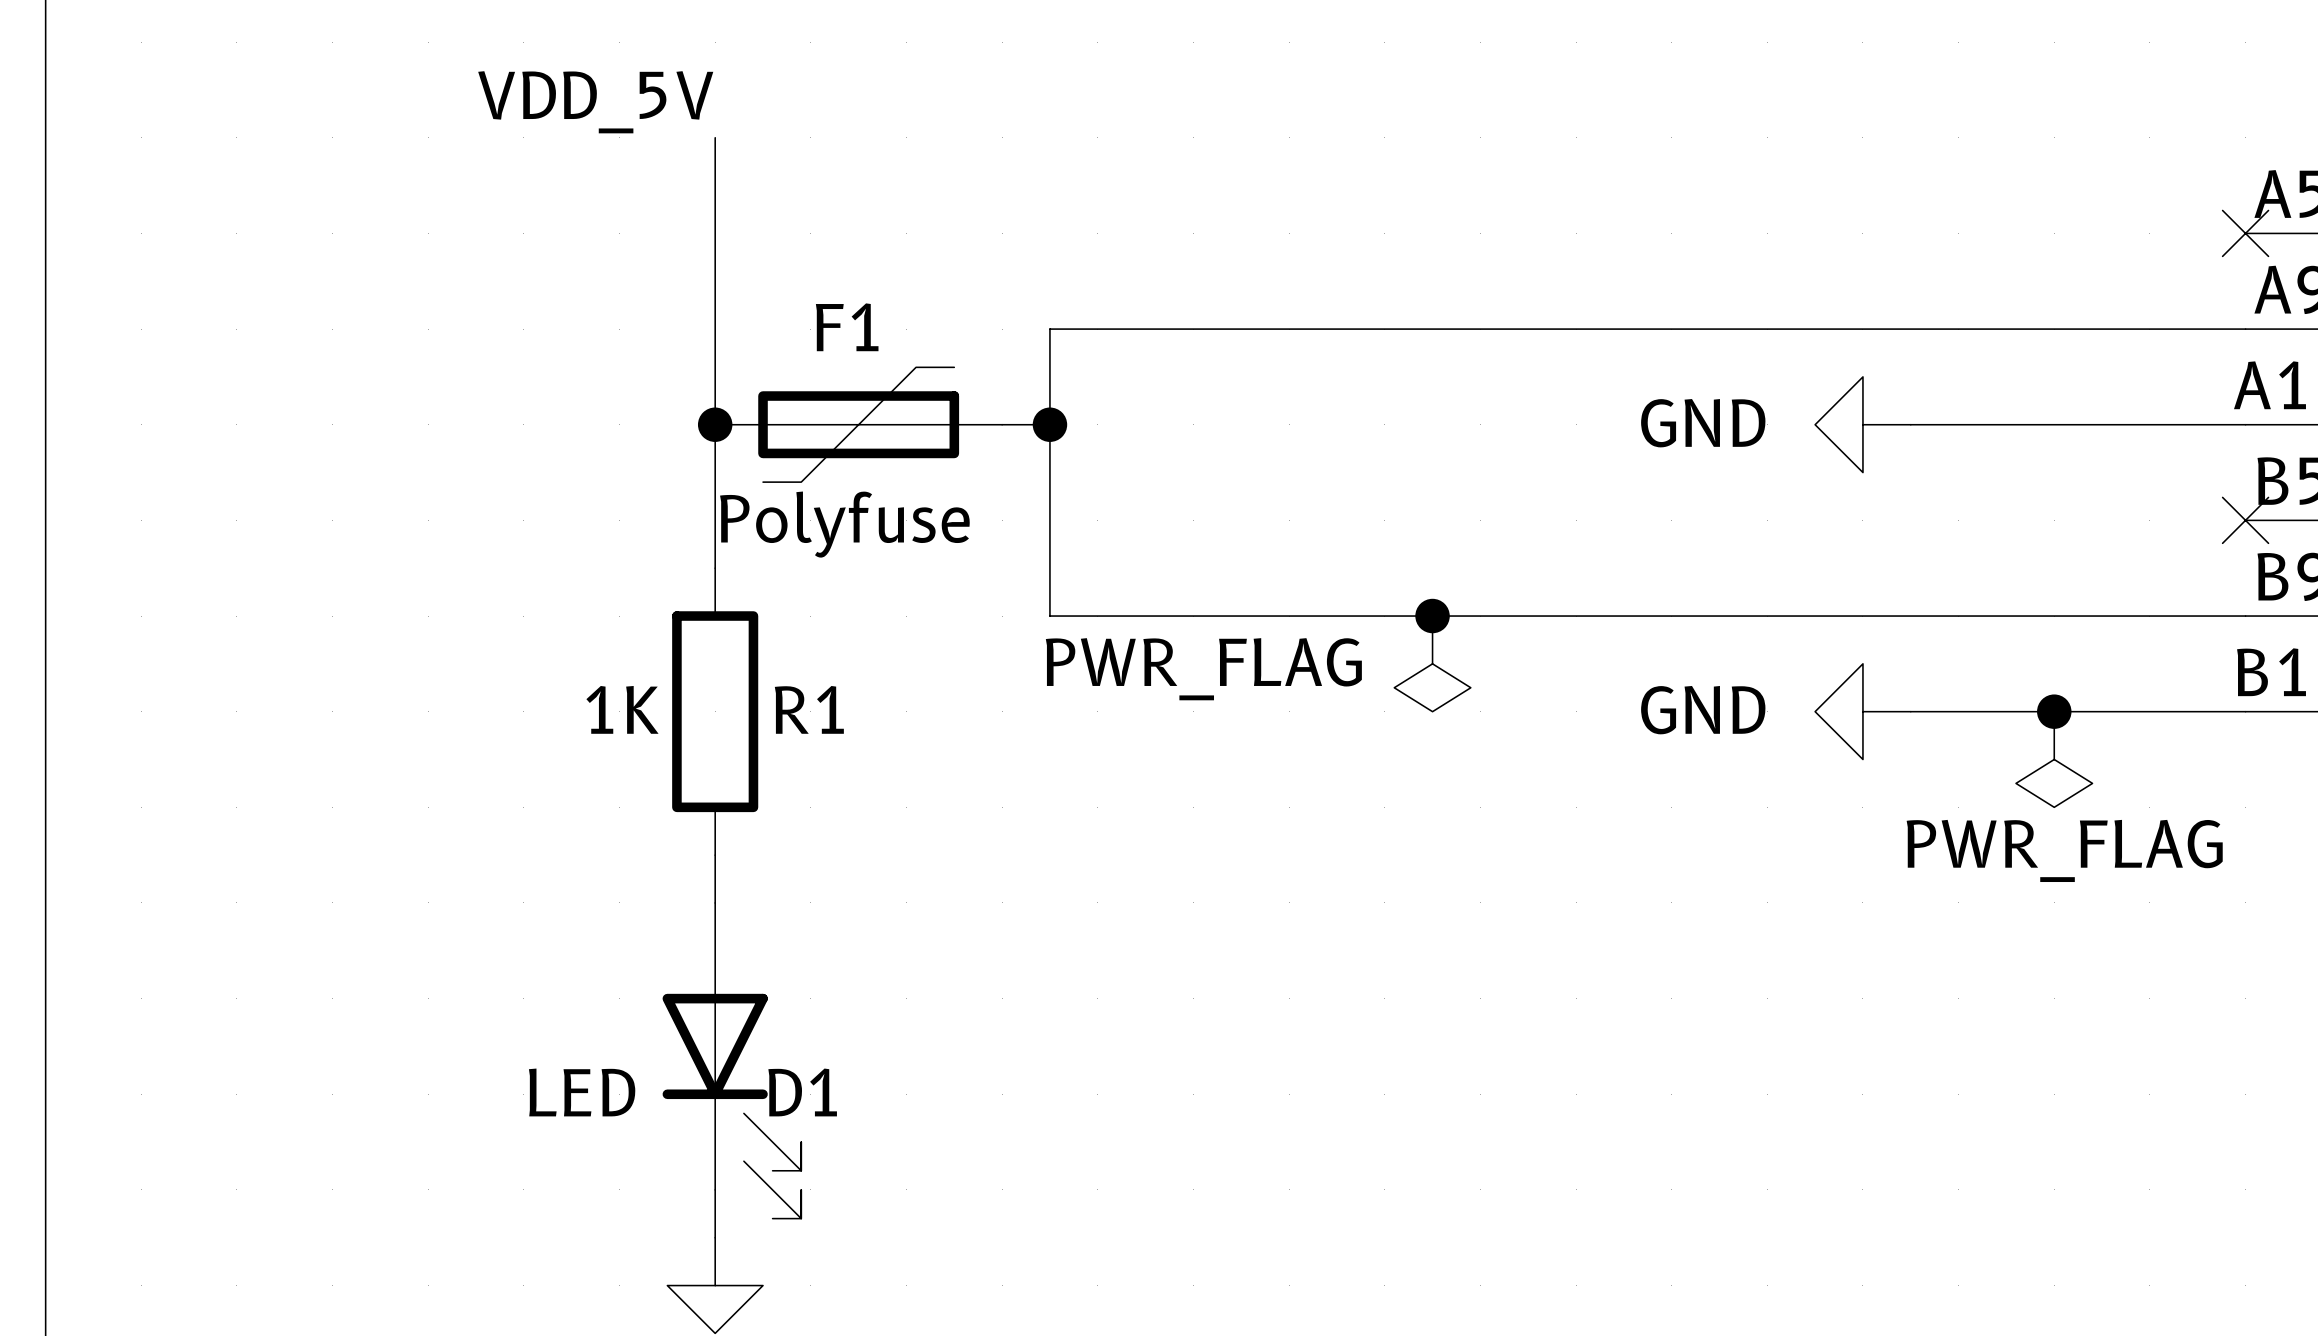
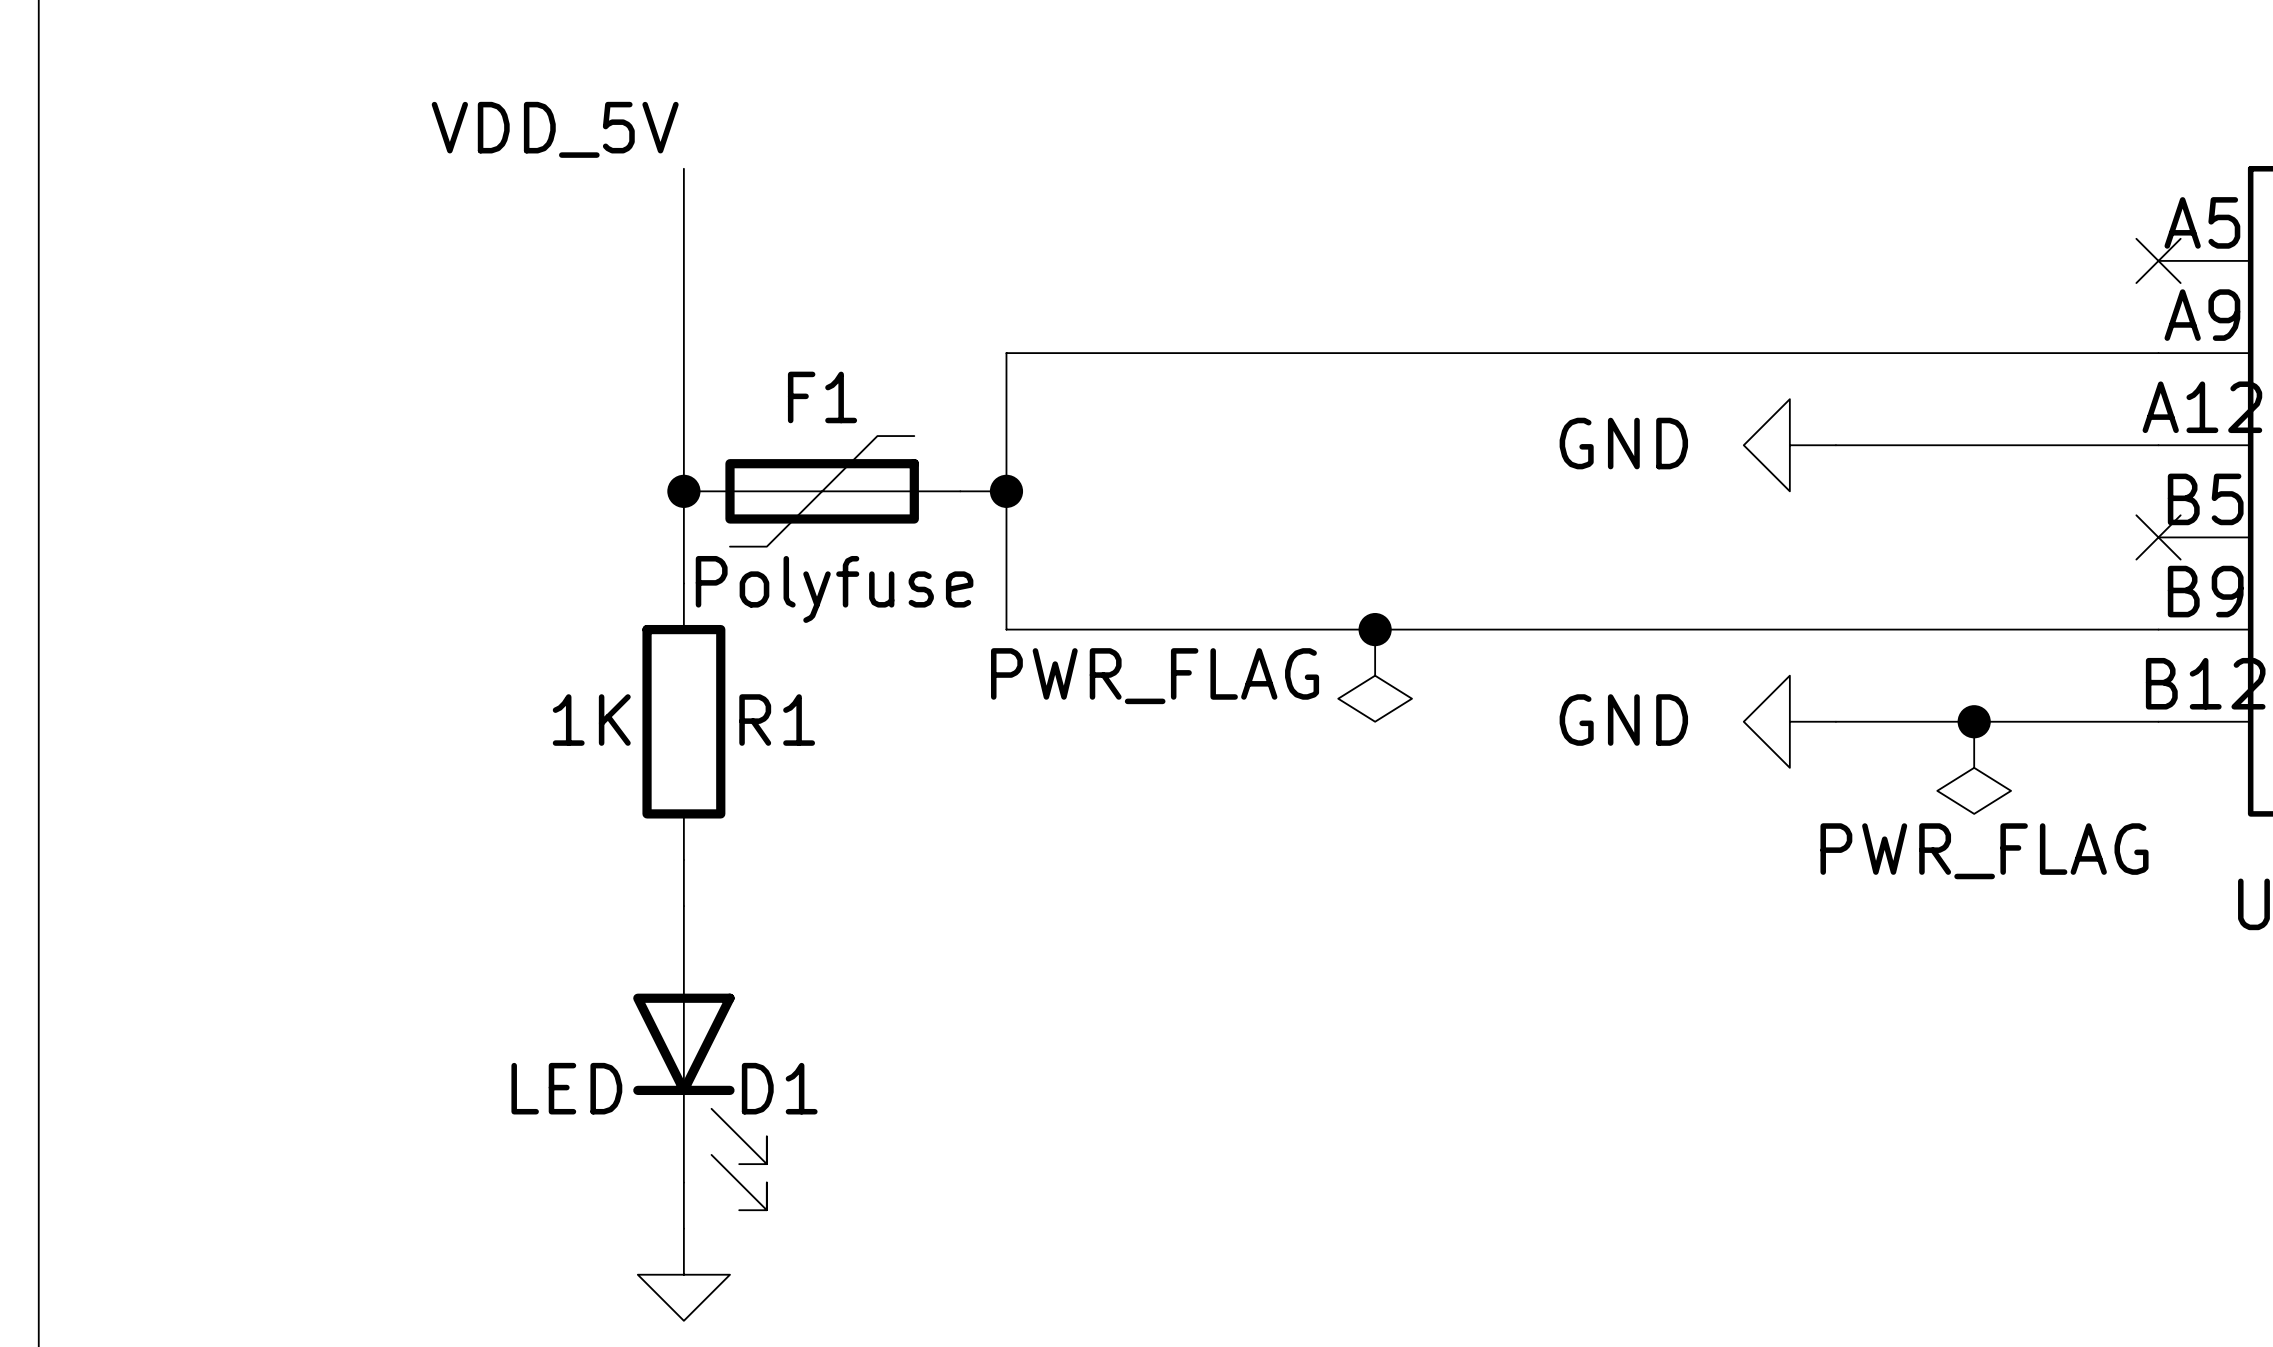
junction position: (715, 424) -> (683, 491)
F1 position: (858, 424) -> (822, 491)
wire: (1002, 424) (1049, 424) -> (960, 491) (1006, 491)
junction position: (1049, 424) -> (1006, 491)

